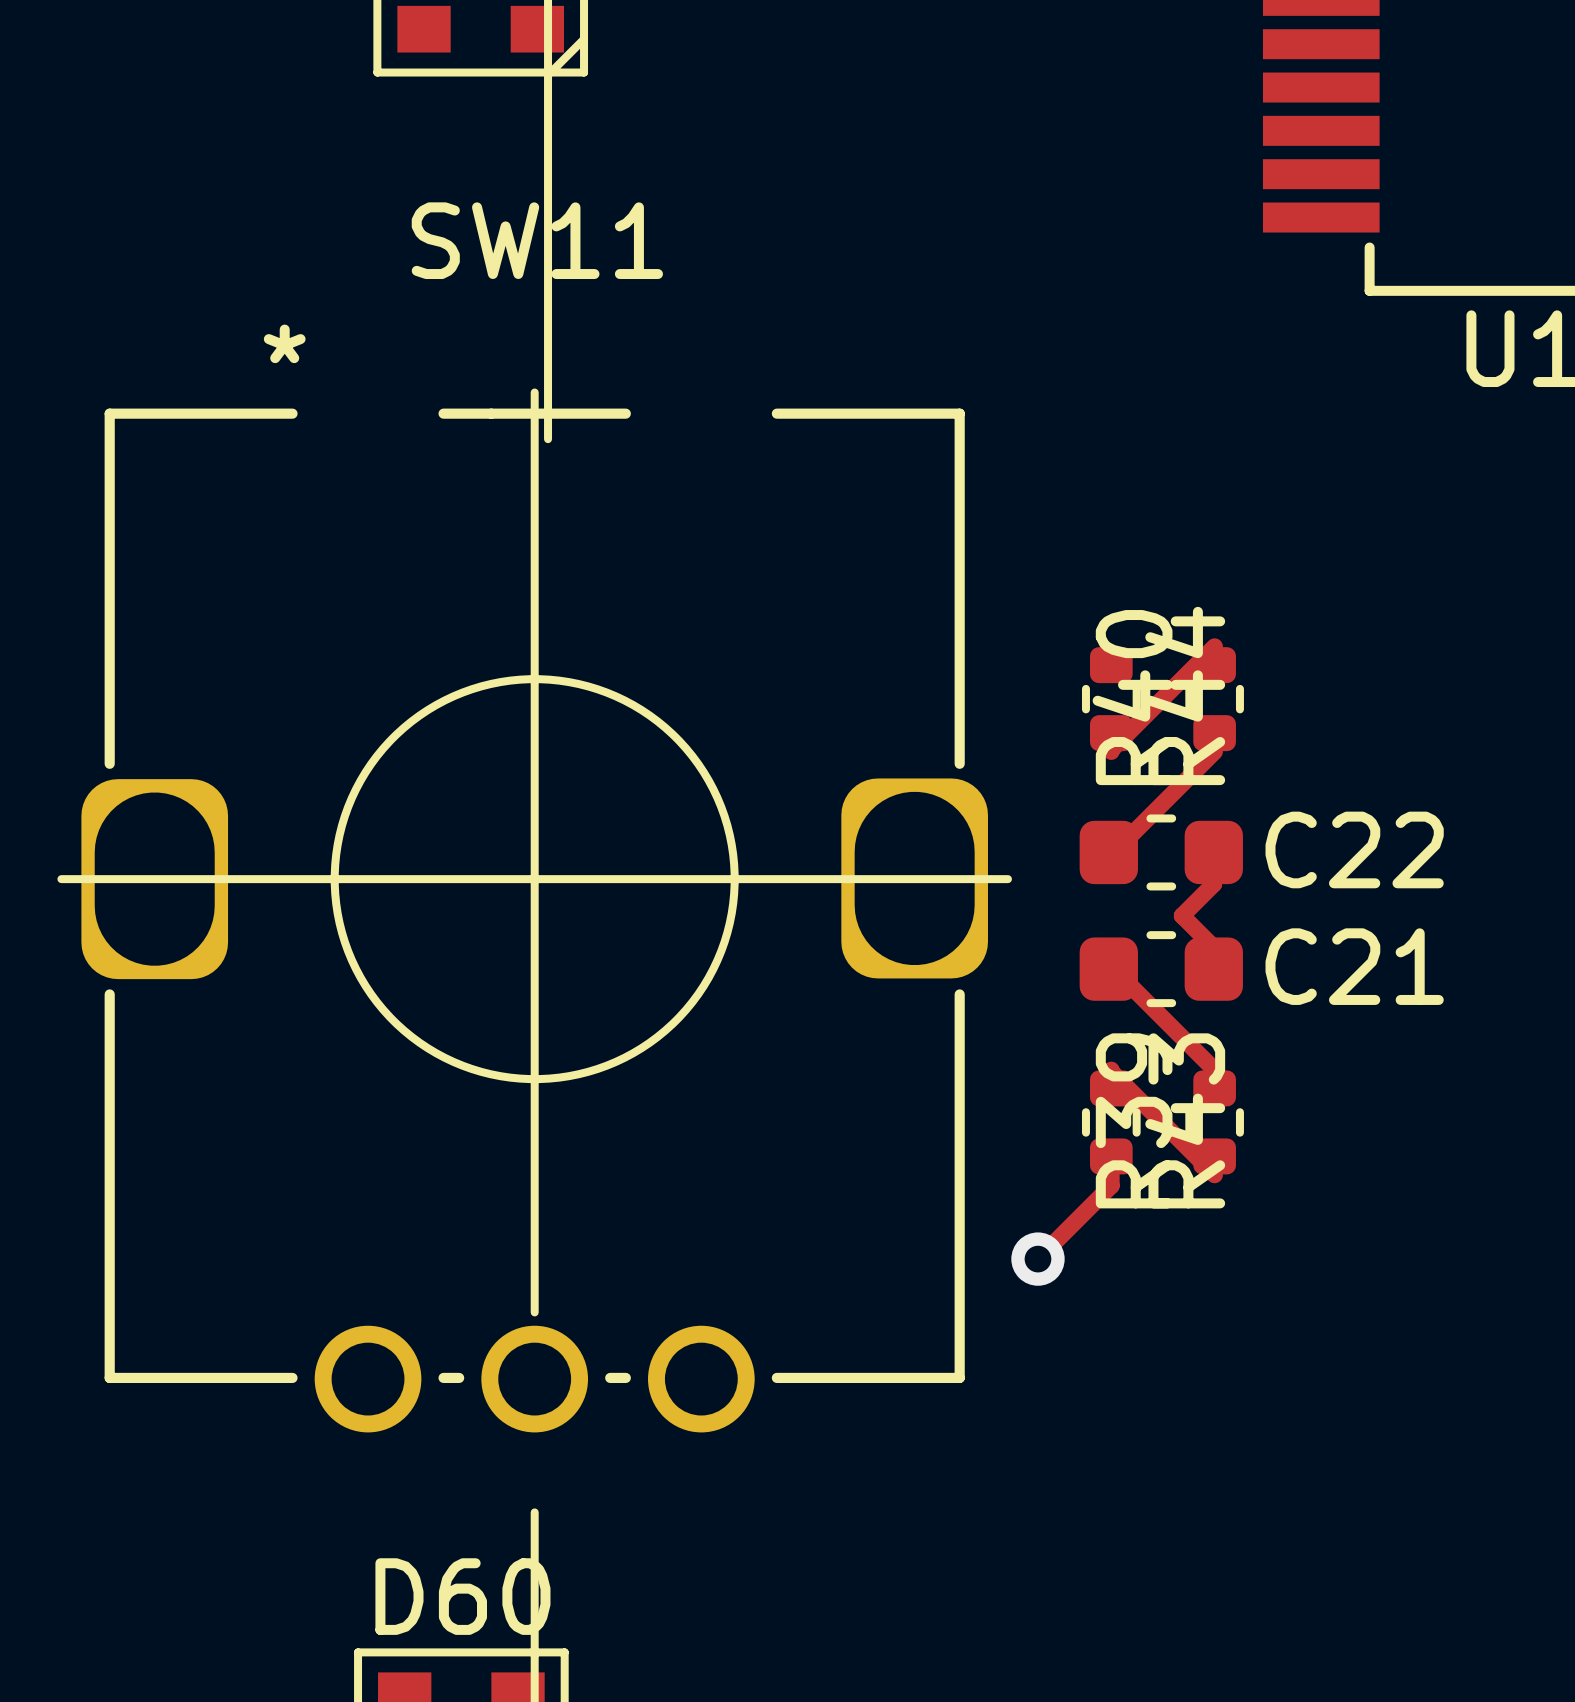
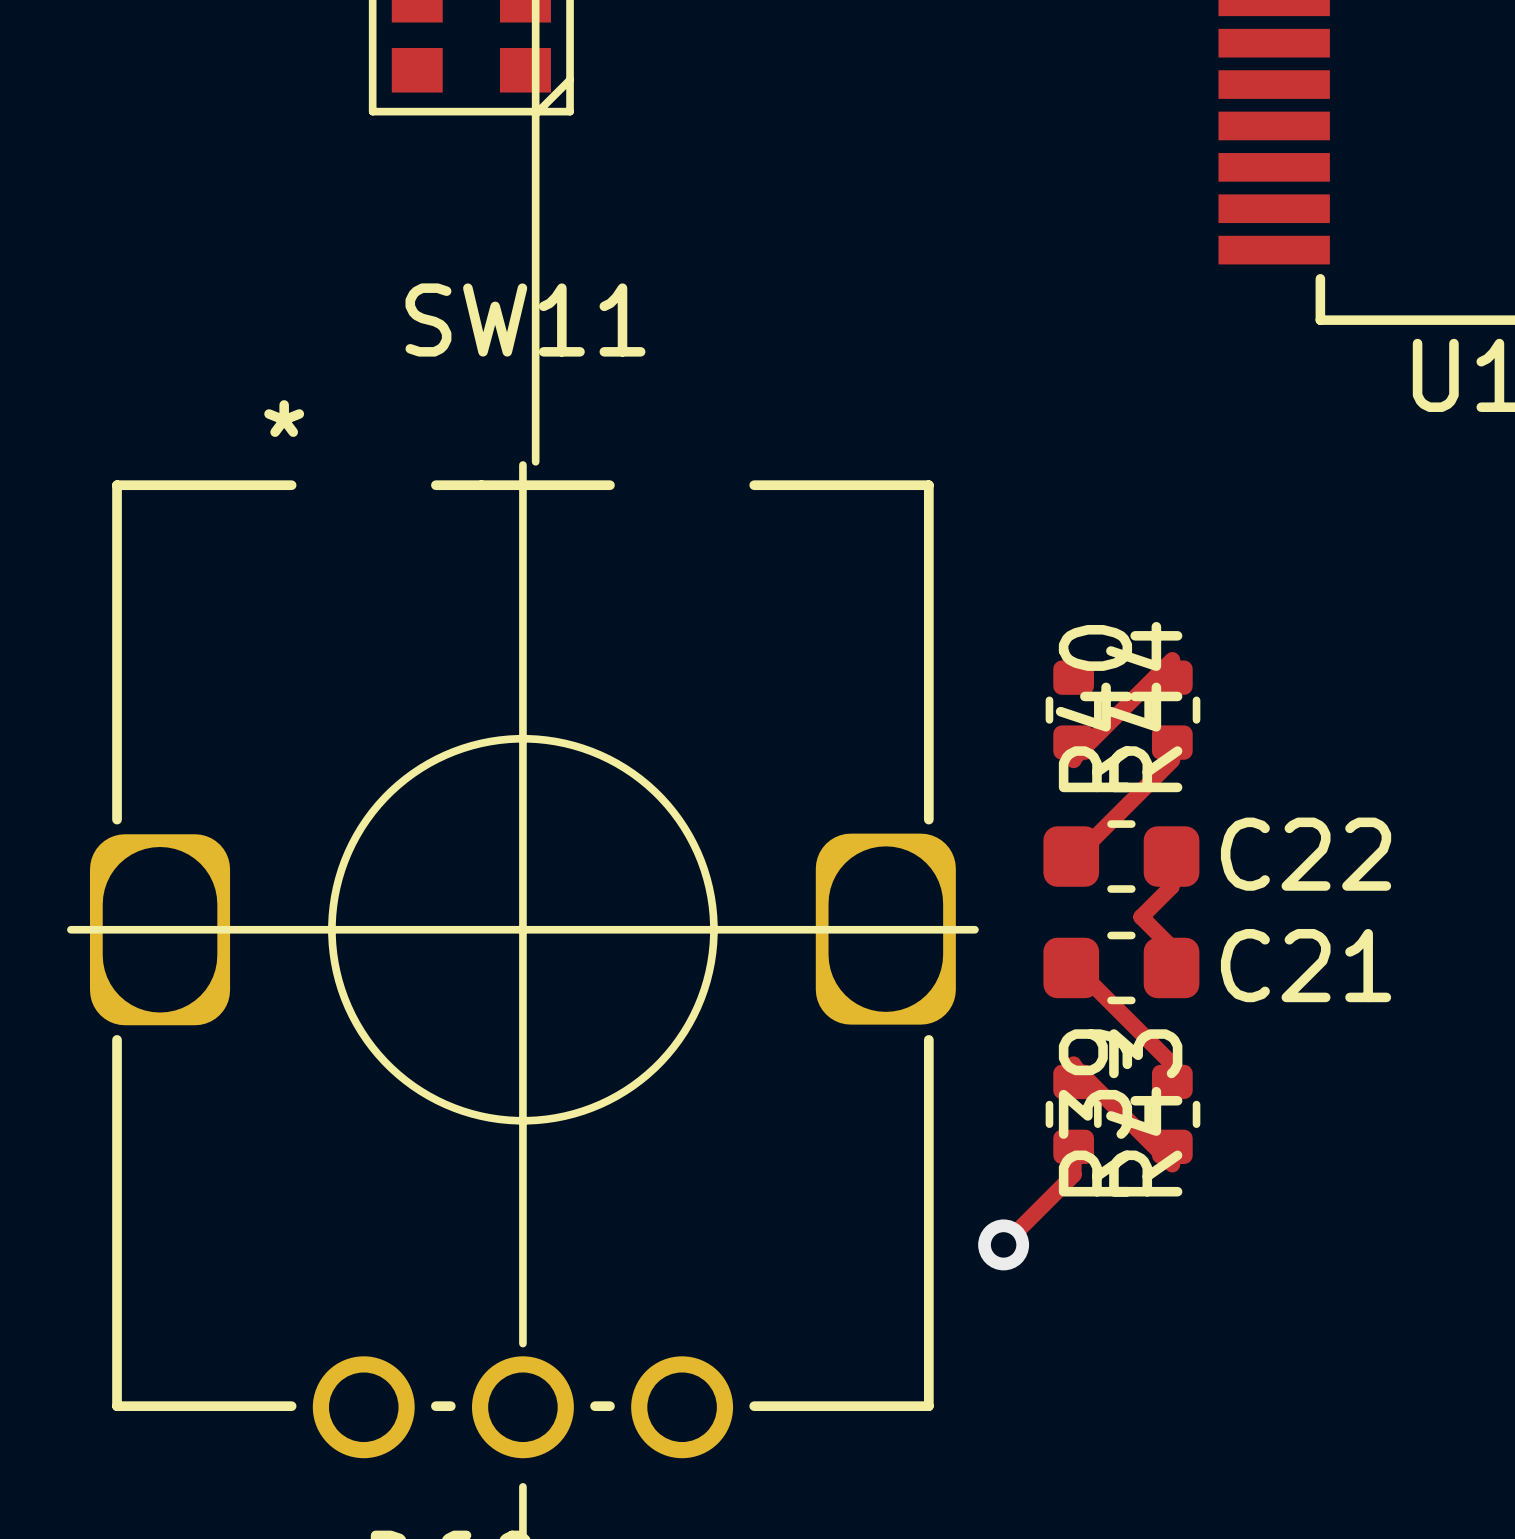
SW11 position: (534, 910) -> (522, 959)

